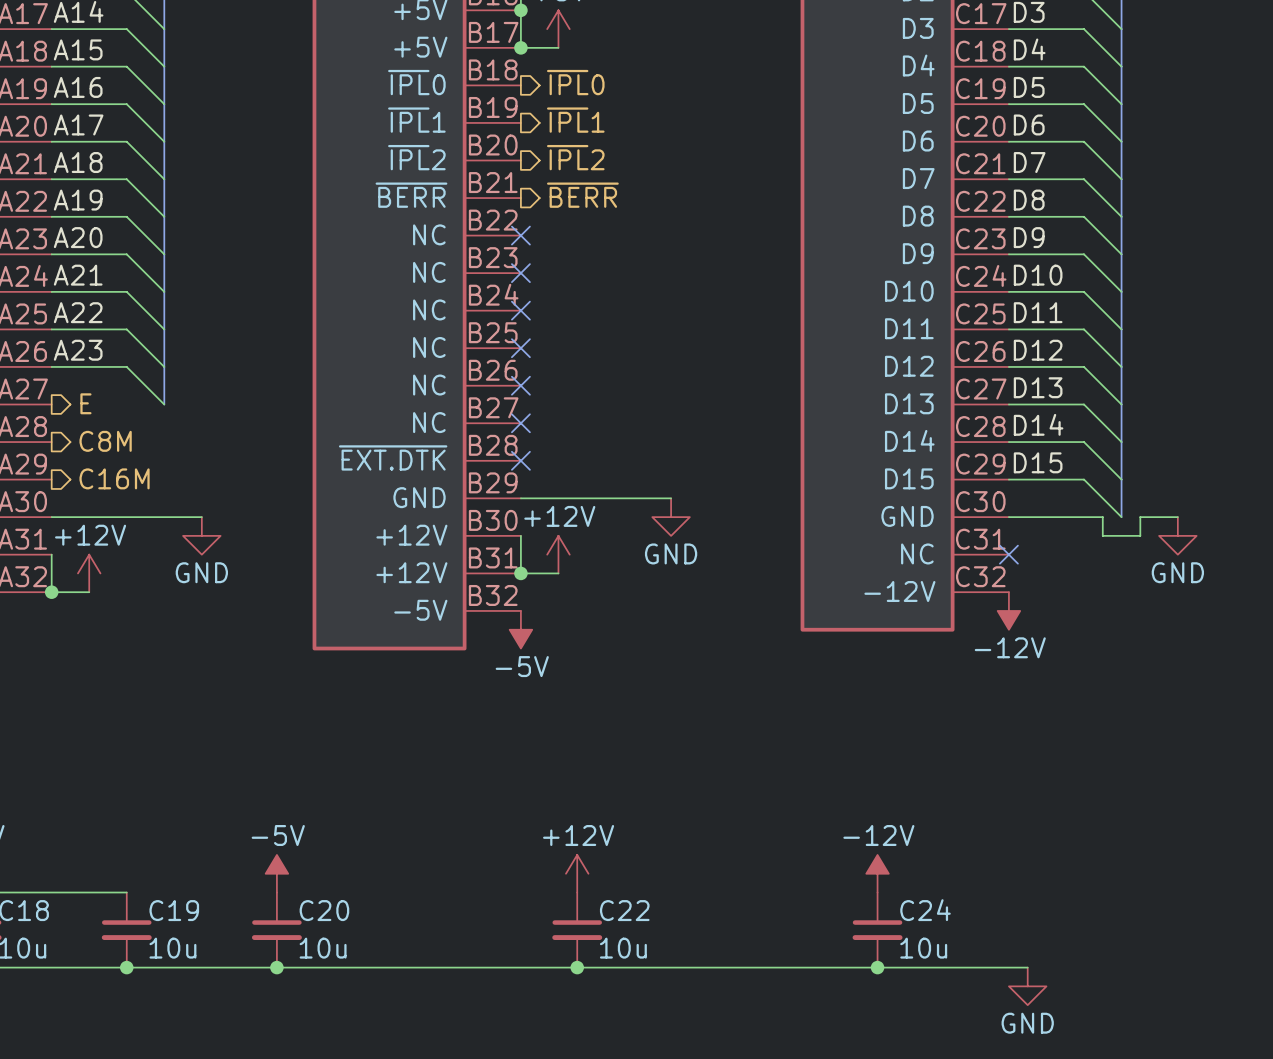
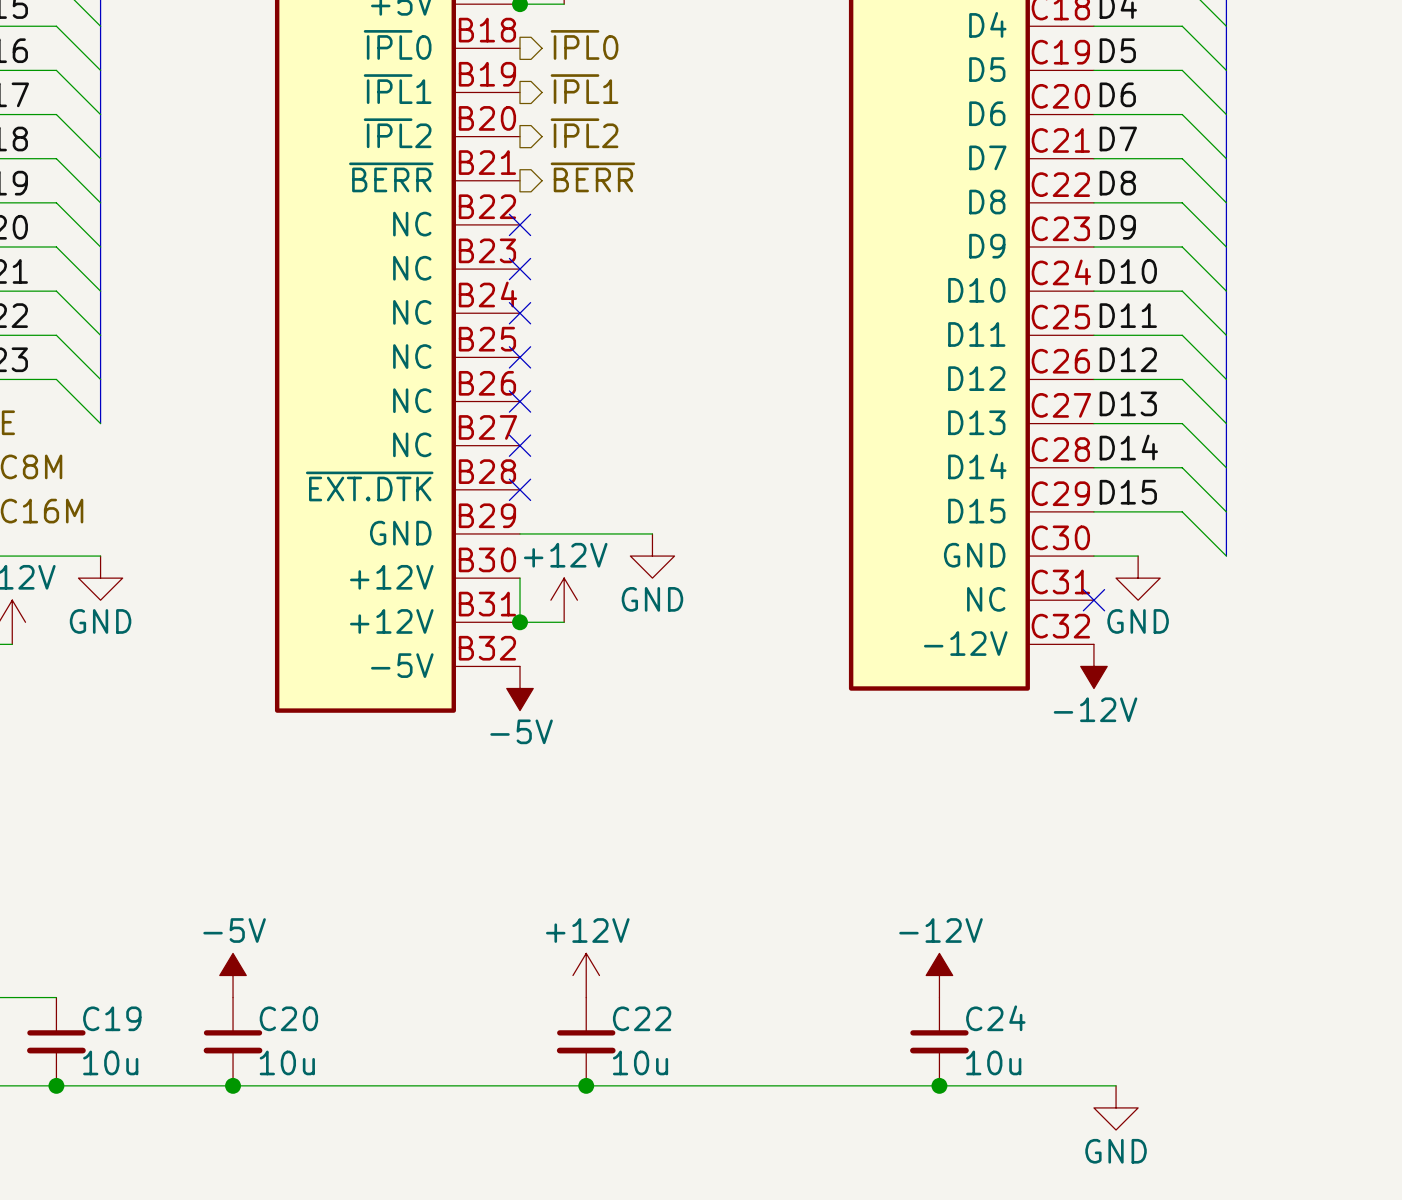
wire: (633, 498) (671, 498) -> none
wire: (164, 517) (201, 517) -> none
power symbol position: GND (671, 517) -> GND (652, 556)
wire: (1046, 517) (1102, 517) (1102, 535) (1140, 535) (1140, 517) (1177, 517) -> none
power symbol position: GND (201, 535) -> GND (100, 578)
power symbol position: GND (1177, 535) -> GND (1138, 578)

